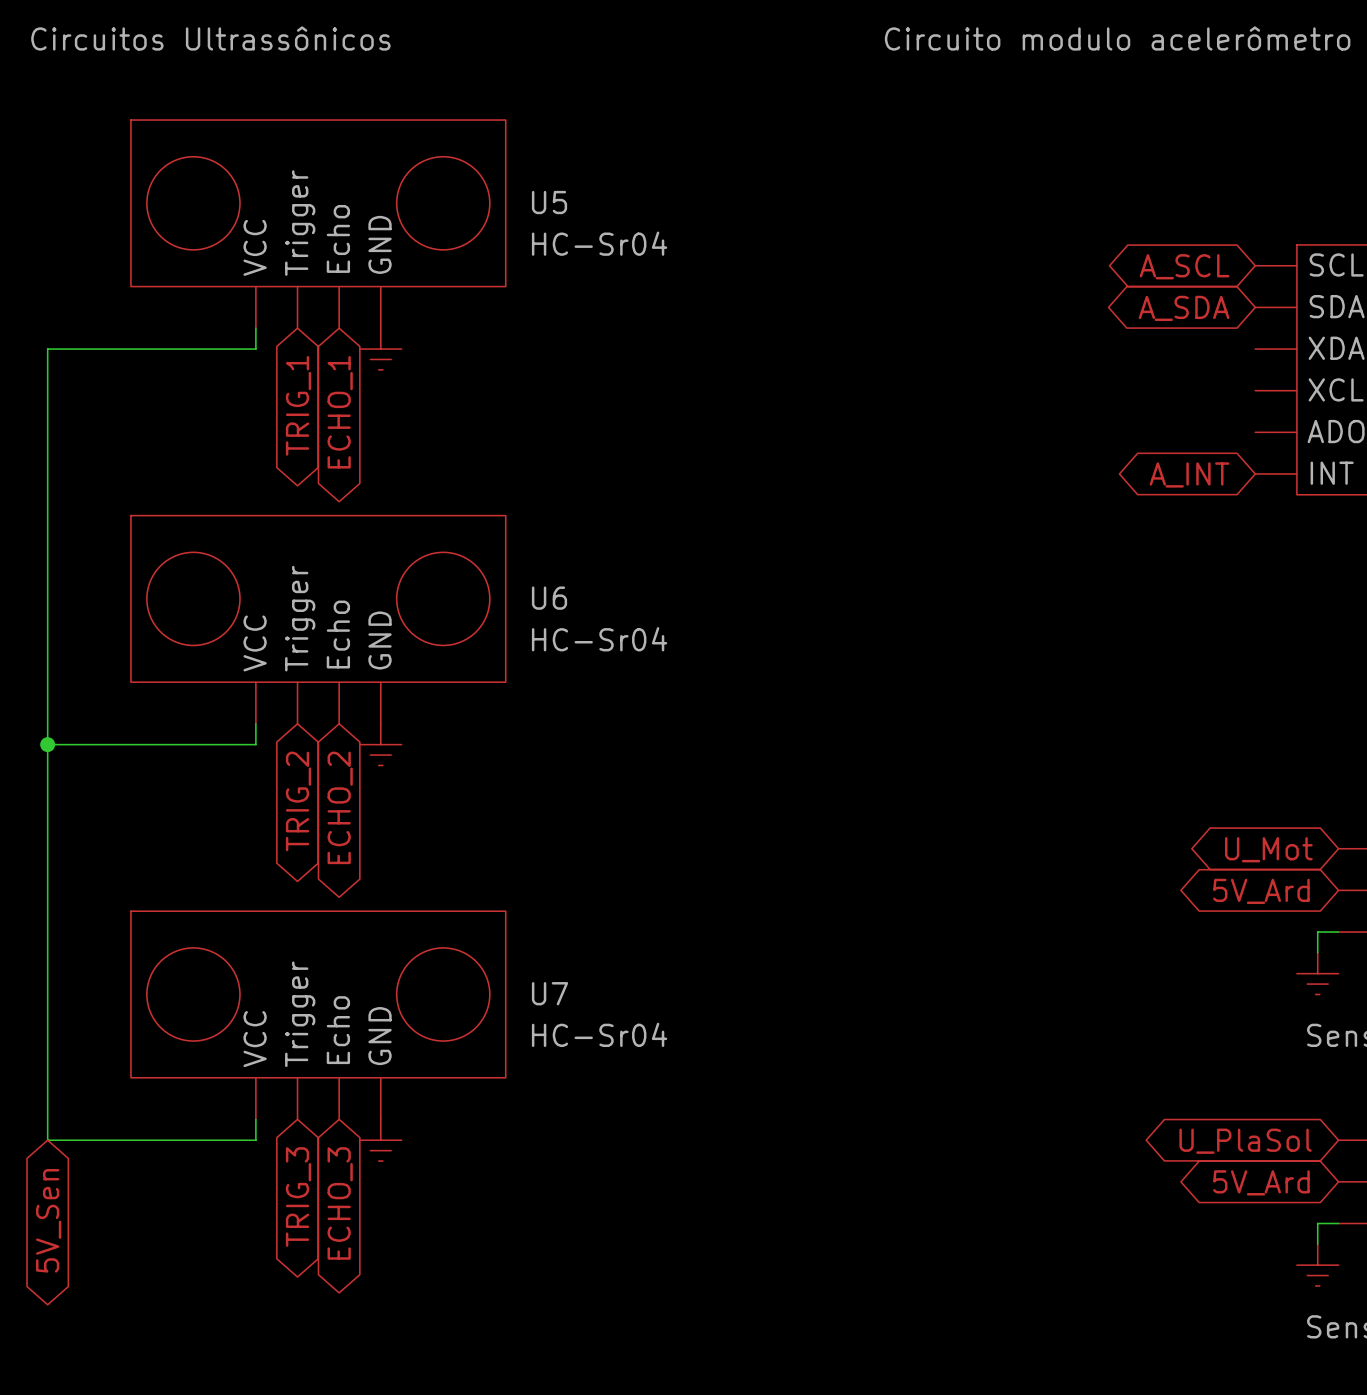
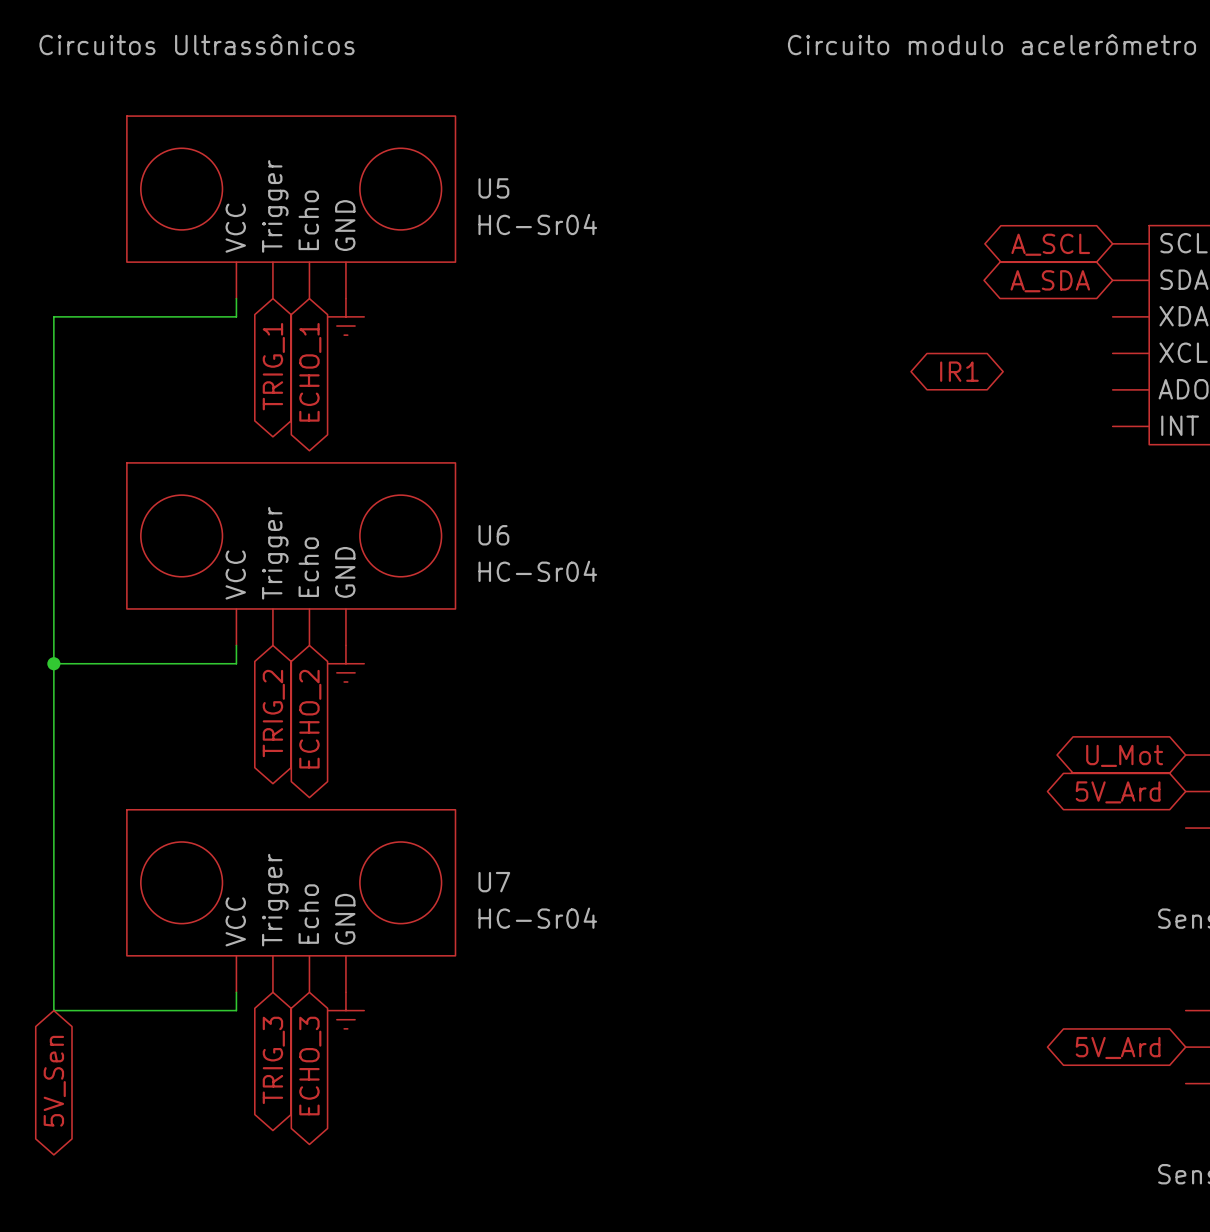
global label: none -> IR1 (959, 371)
global label: A_INT (1189, 474) -> none
wire: (1338, 932) (1317, 932) (1317, 952) -> none
power symbol: (1317, 973) -> none
global label: U_PlaSol (1245, 1141) -> none
wire: (1338, 1223) (1317, 1223) (1317, 1244) -> none
power symbol: (1317, 1265) -> none

